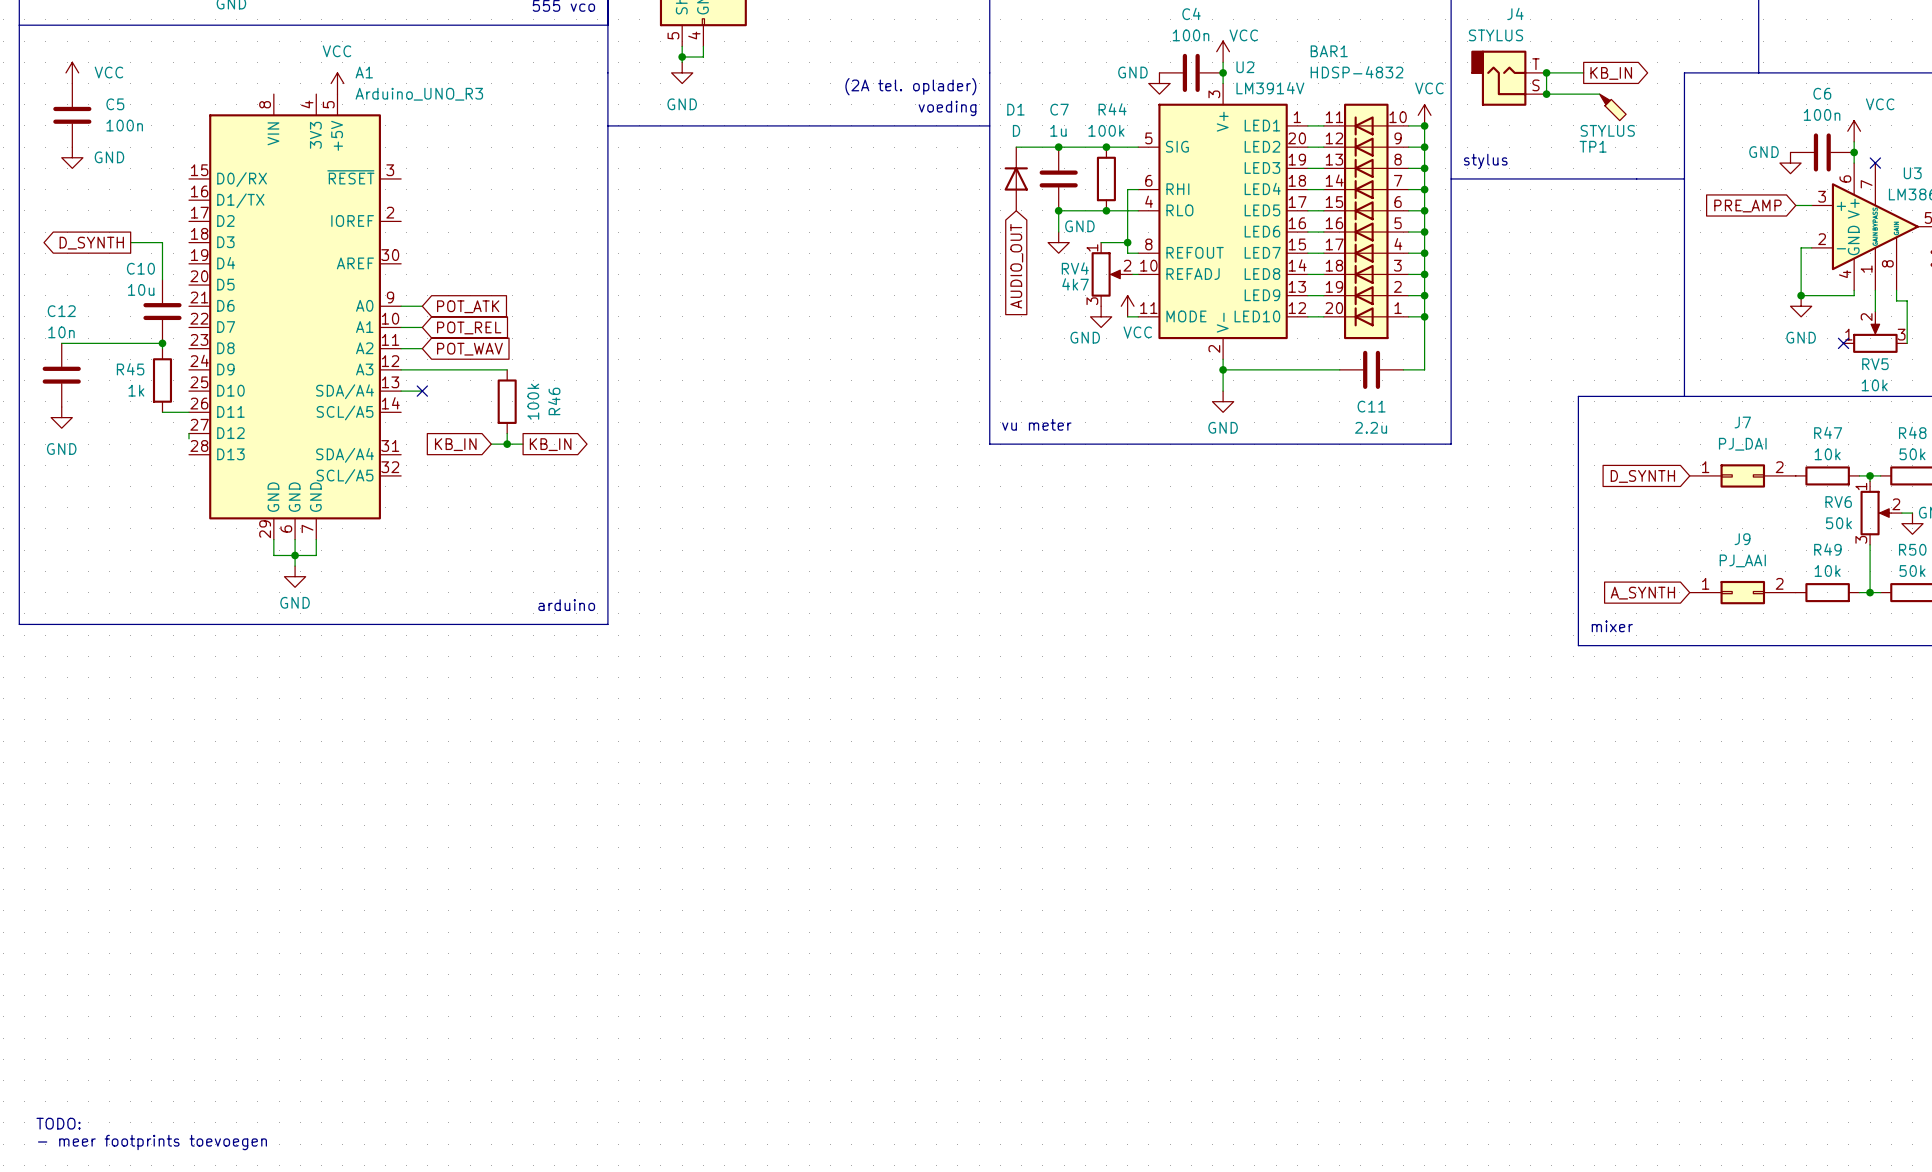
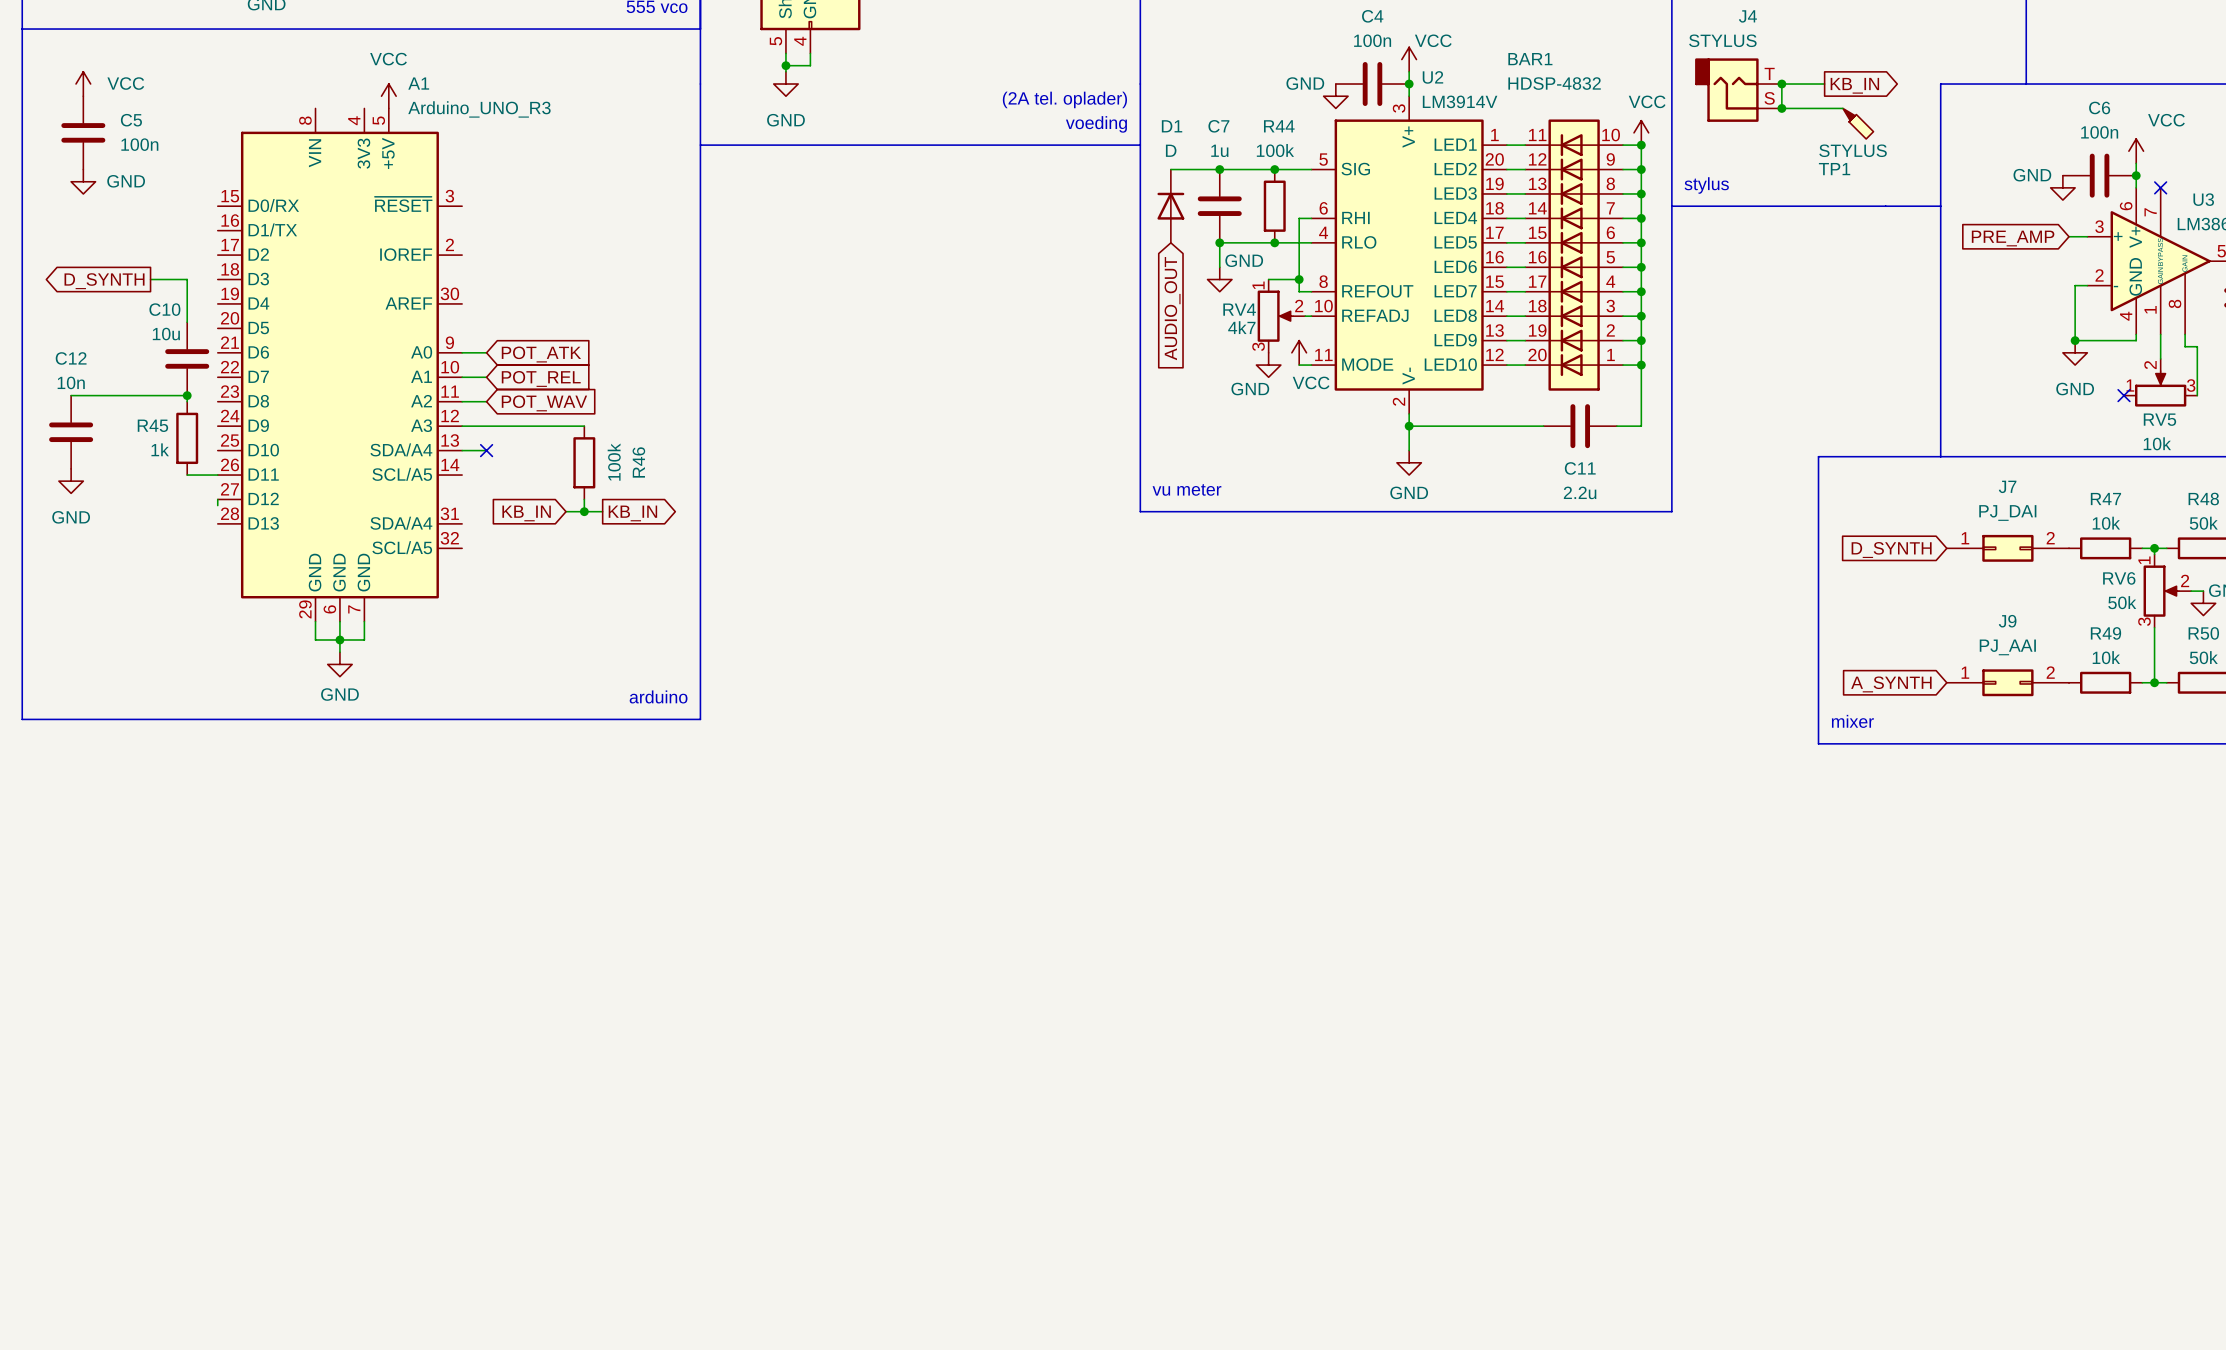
text: TODO: (58, 1123) -> none
text: - meer footprints toevoegen (152, 1142) -> none

